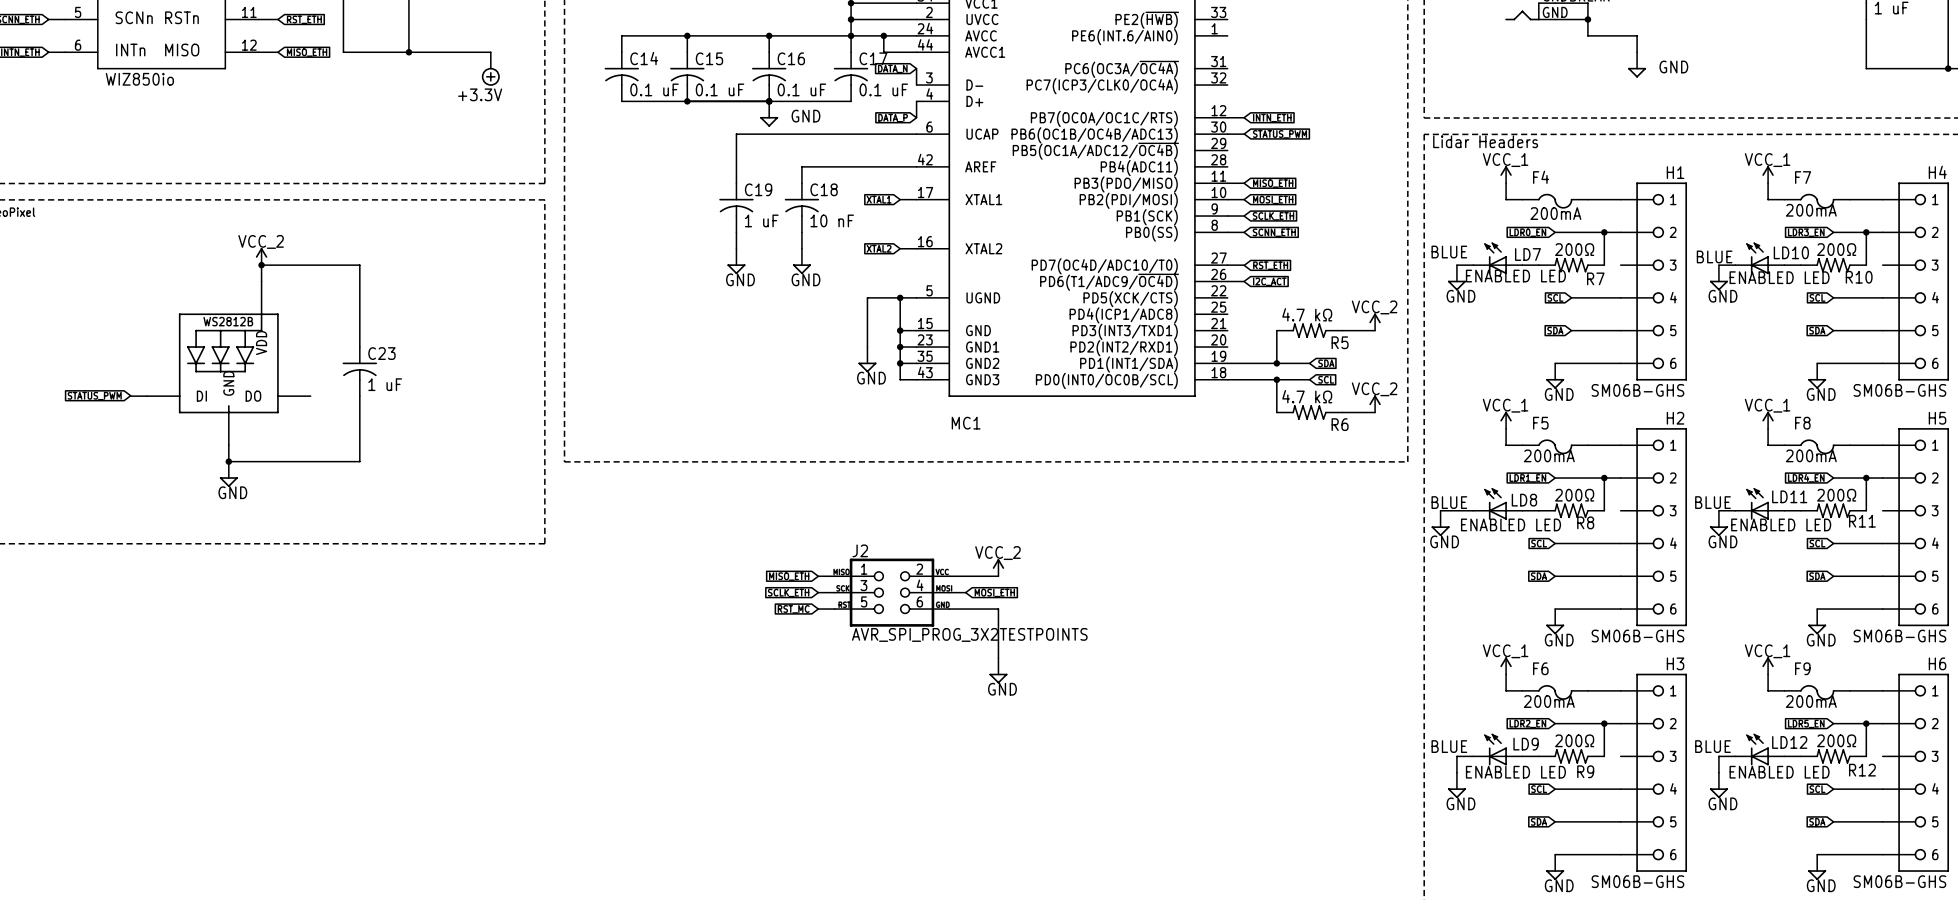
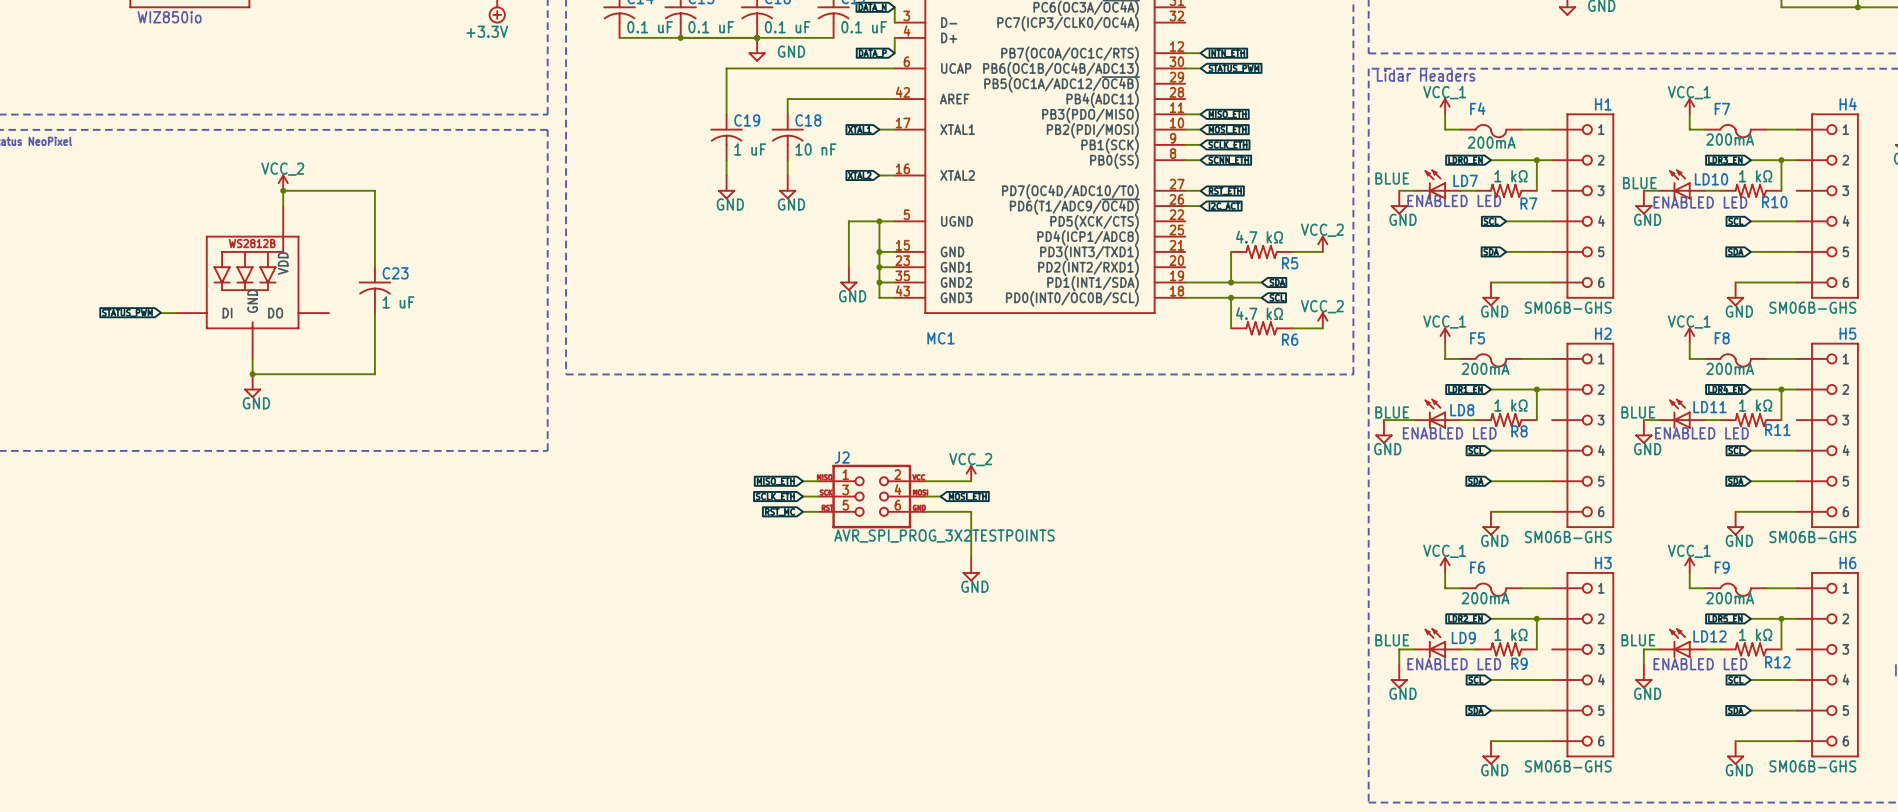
R7 value: 200Ω (1574, 249) -> 1 kΩ (1510, 176)
R10 value: 200Ω (1836, 249) -> 1 kΩ (1755, 176)
R8 value: 200Ω (1574, 495) -> 1 kΩ (1510, 405)
R11 value: 200Ω (1836, 495) -> 1 kΩ (1755, 405)
R9 value: 200Ω (1574, 740) -> 1 kΩ (1510, 634)
R12 value: 200Ω (1836, 740) -> 1 kΩ (1755, 634)

